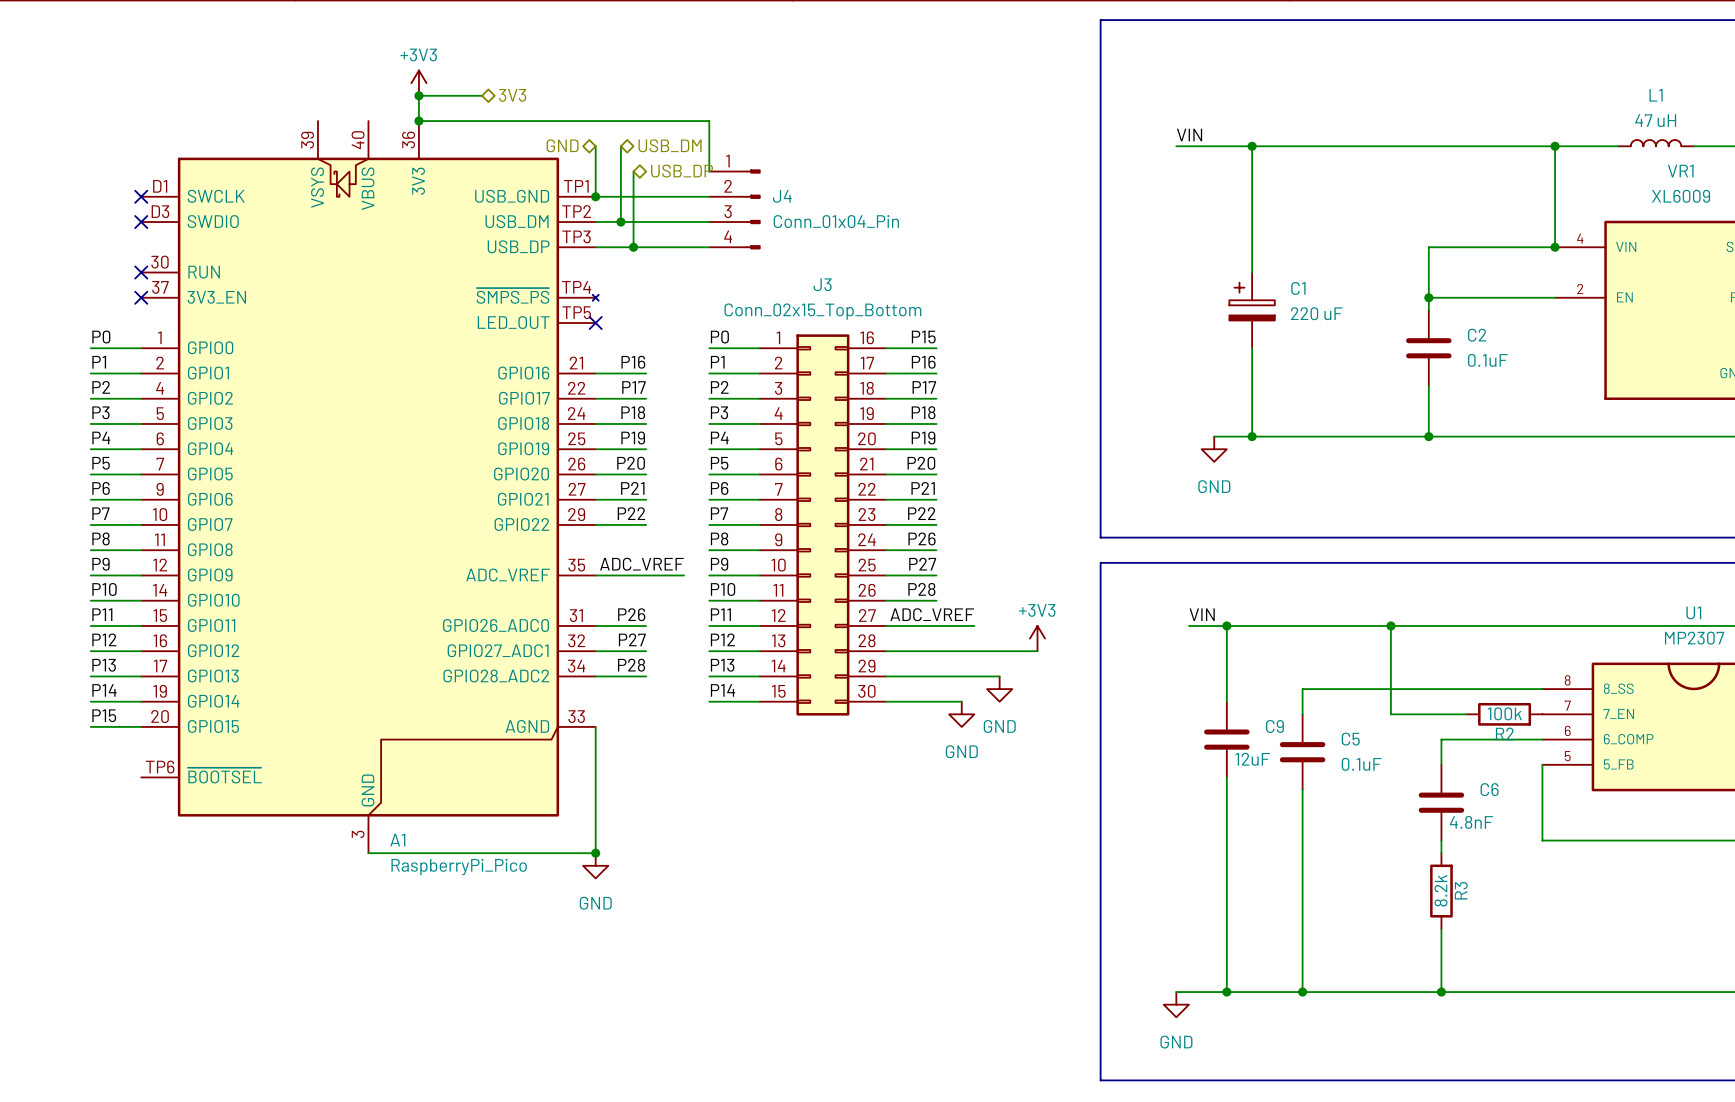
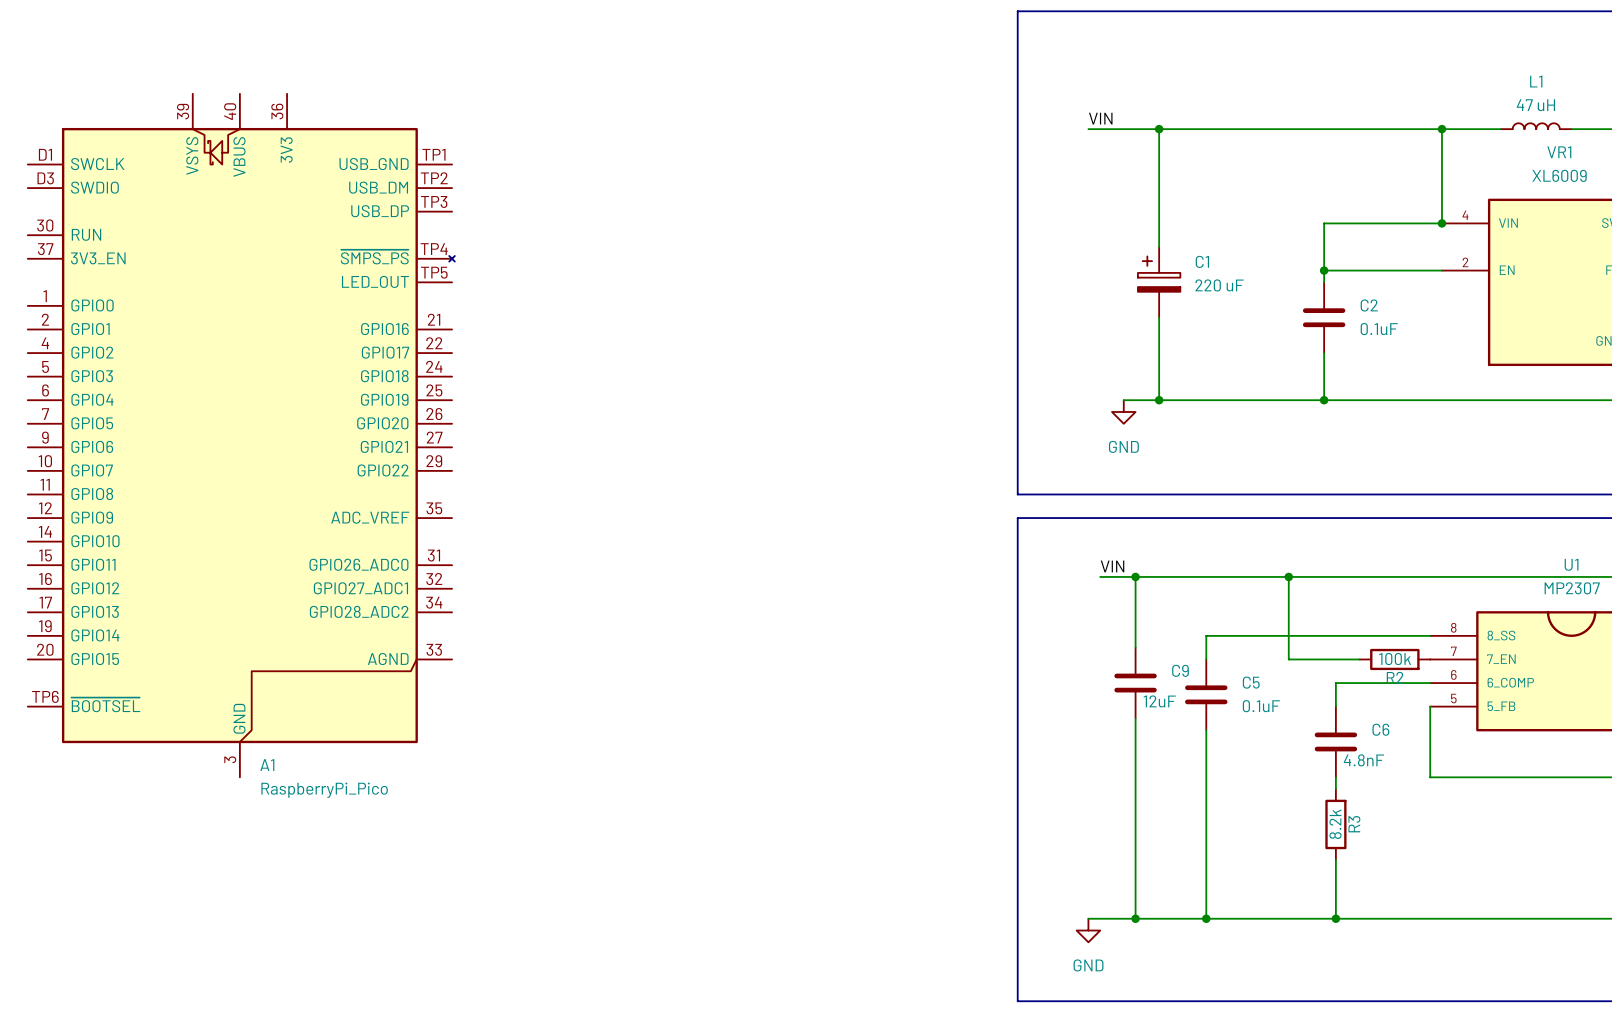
power symbol: +3V3 (418, 83) -> none
junction: (418, 95) -> none
wire: (482, 95) (418, 95) (418, 121) (709, 121) (709, 171) -> none
hierarchical label: 3V3 (512, 95) -> none
junction: (418, 121) -> none
hierarchical label: GND (562, 145) -> none
hierarchical label: USB_DM (670, 145) -> none
wire: (595, 146) (595, 196) (709, 196) -> none
wire: (620, 146) (620, 222) -> none
wire: (633, 171) (633, 247) -> none
hierarchical label: USB_DP (682, 171) -> none
no-connect mark: (141, 196) -> none
junction: (595, 196) -> none
J4: Conn_01x04_Pin (734, 209) -> none
no-connect mark: (141, 222) -> none
wire: (595, 222) (709, 222) -> none
junction: (620, 222) -> none
wire: (595, 247) (709, 247) -> none
junction: (633, 247) -> none
no-connect mark: (141, 272) -> none
no-connect mark: (141, 297) -> none
no-connect mark: (595, 323) -> none
label: P0 (101, 337) -> none
label: P0 (719, 337) -> none
label: P15 (923, 337) -> none
wire: (709, 348) (759, 348) -> none
wire: (886, 348) (936, 348) -> none
label: P1 (99, 362) -> none
label: P16 (633, 362) -> none
label: P1 (717, 362) -> none
label: P16 (923, 362) -> none
wire: (595, 373) (646, 373) -> none
wire: (709, 373) (759, 373) -> none
wire: (886, 373) (936, 373) -> none
label: P2 (101, 387) -> none
label: P17 (634, 387) -> none
label: P2 (719, 387) -> none
label: P17 (924, 387) -> none
wire: (595, 398) (646, 398) -> none
wire: (709, 398) (759, 398) -> none
wire: (886, 398) (936, 398) -> none
label: P3 (100, 412) -> none
label: P18 (633, 412) -> none
label: P3 (719, 412) -> none
label: P18 (923, 412) -> none
wire: (595, 423) (646, 423) -> none
wire: (709, 423) (759, 423) -> none
wire: (886, 423) (936, 423) -> none
label: P4 (101, 437) -> none
label: P19 (633, 437) -> none
label: P4 (719, 437) -> none
label: P19 (923, 437) -> none
wire: (595, 449) (646, 449) -> none
wire: (709, 449) (759, 449) -> none
wire: (886, 449) (936, 449) -> none
label: P5 (101, 463) -> none
label: P20 (631, 463) -> none
label: P5 (719, 463) -> none
label: P20 (921, 463) -> none
wire: (595, 474) (646, 474) -> none
wire: (709, 474) (759, 474) -> none
wire: (886, 474) (936, 474) -> none
A1 position: (369, 487) -> (241, 435)
label: P6 (101, 488) -> none
label: P21 (632, 488) -> none
label: P6 (719, 488) -> none
label: P21 (923, 488) -> none
wire: (595, 499) (646, 499) -> none
wire: (709, 499) (759, 499) -> none
wire: (886, 499) (936, 499) -> none
label: P7 (100, 513) -> none
label: P22 (631, 513) -> none
label: P7 (719, 513) -> none
label: P22 (921, 513) -> none
wire: (595, 524) (646, 524) -> none
wire: (709, 524) (759, 524) -> none
J3: Conn_02x15_Top_Bottom (822, 524) -> none
wire: (886, 524) (936, 524) -> none
label: P8 (101, 538) -> none
label: P8 (719, 538) -> none
label: P26 (922, 538) -> none
wire: (709, 550) (759, 550) -> none
wire: (886, 550) (936, 550) -> none
label: P9 (100, 564) -> none
label: ADC_VREF (641, 564) -> none
label: P9 (719, 564) -> none
label: P27 (922, 564) -> none
wire: (595, 575) (684, 575) -> none
wire: (709, 575) (759, 575) -> none
wire: (886, 575) (936, 575) -> none
label: P10 (104, 589) -> none
label: P10 (723, 589) -> none
label: P28 (921, 589) -> none
wire: (709, 600) (759, 600) -> none
wire: (886, 600) (936, 600) -> none
label: P11 (102, 614) -> none
label: P26 (631, 614) -> none
label: P11 (720, 614) -> none
label: ADC_VREF (932, 614) -> none
wire: (595, 625) (646, 625) -> none
wire: (709, 625) (759, 625) -> none
wire: (886, 625) (974, 625) -> none
power symbol: +3V3 (1037, 638) -> none
label: P12 (104, 639) -> none
label: P27 (632, 639) -> none
label: P12 (722, 639) -> none
wire: (595, 651) (646, 651) -> none
wire: (709, 651) (759, 651) -> none
wire: (886, 651) (1037, 651) -> none
label: P13 (104, 665) -> none
label: P28 (631, 665) -> none
label: P13 (722, 665) -> none
wire: (595, 676) (646, 676) -> none
wire: (709, 676) (759, 676) -> none
wire: (886, 676) (999, 676) -> none
power symbol: GND (999, 689) -> none
label: P14 (104, 690) -> none
label: P14 (722, 690) -> none
wire: (709, 701) (759, 701) -> none
wire: (886, 701) (961, 701) -> none
power symbol: GND (961, 714) -> none
label: P15 (104, 715) -> none
wire: (595, 726) (595, 853) (368, 853) -> none
junction: (595, 853) -> none
power symbol: GND (595, 865) -> none

